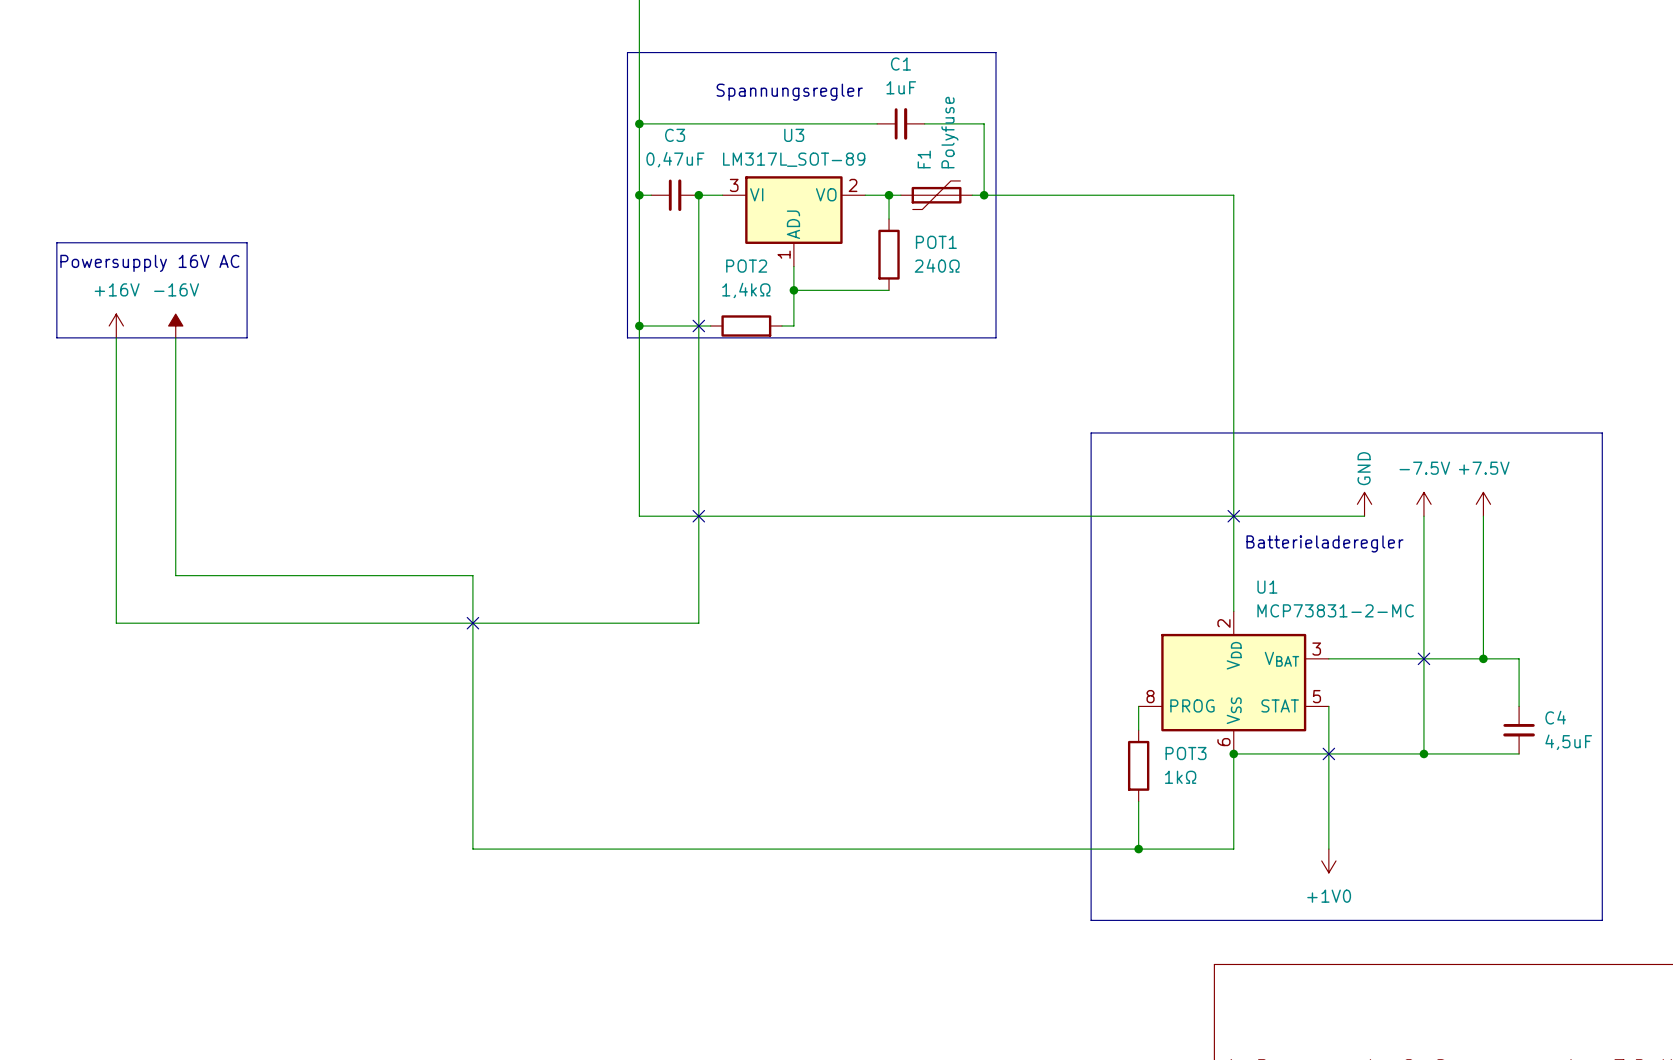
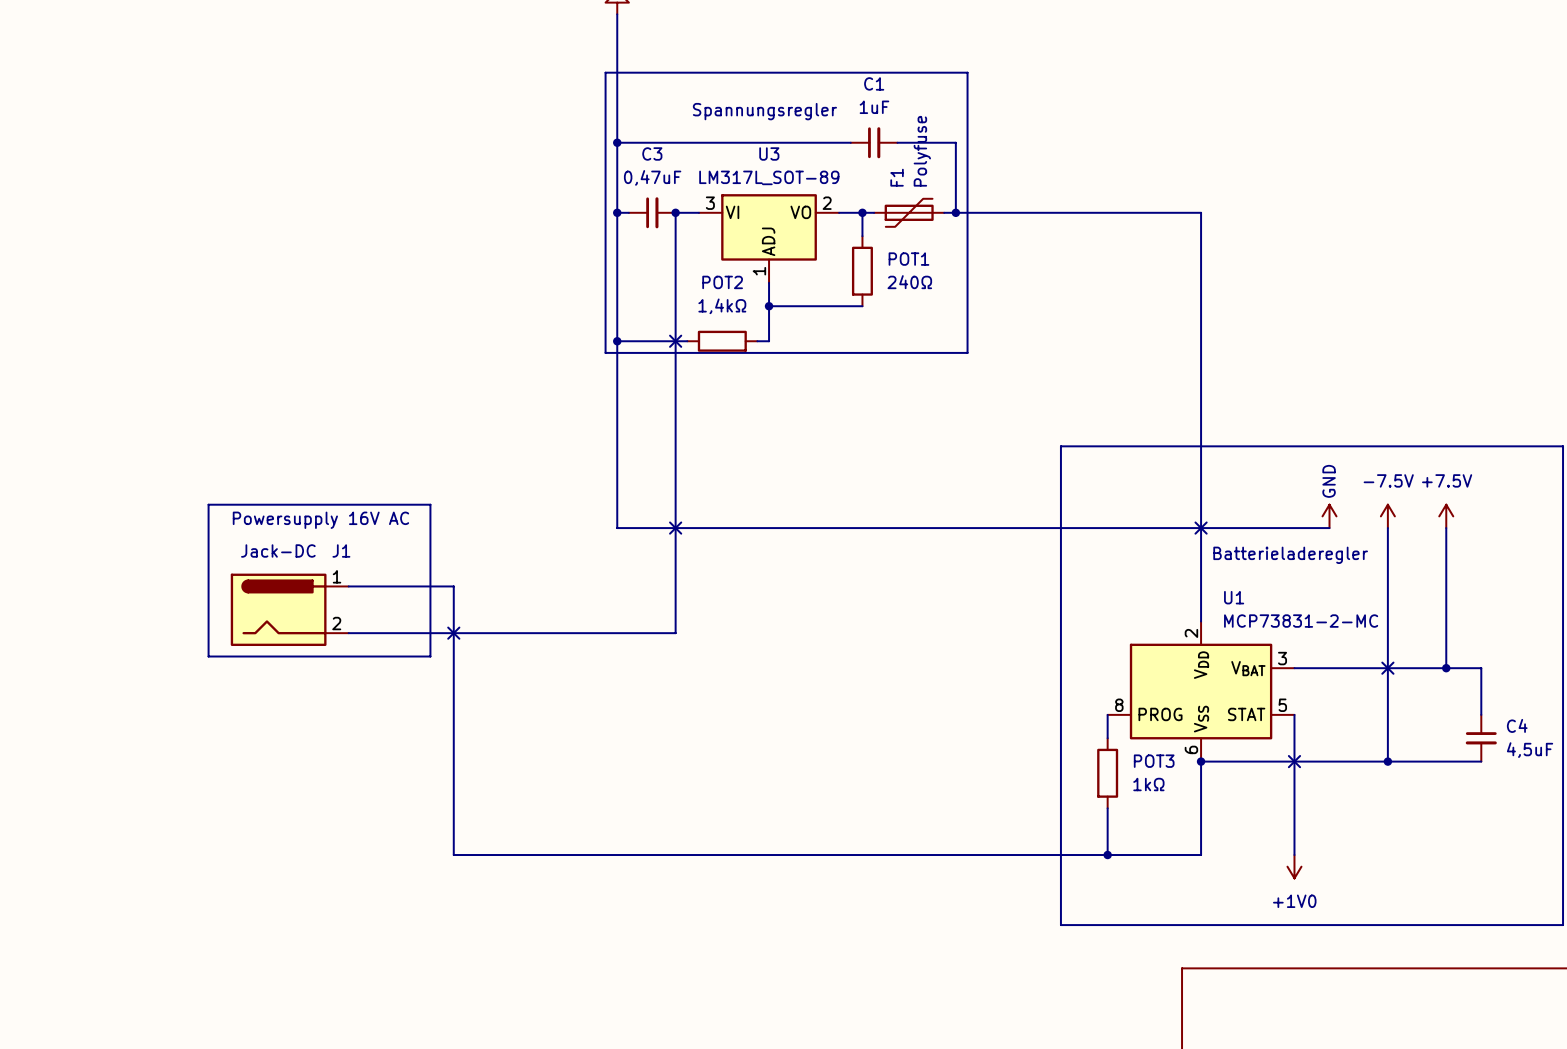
line: (56, 242) (247, 242) (247, 337) (56, 337) (56, 242) -> none
text: Powersupply 16V AC (149, 263) -> none
power symbol: +16V (116, 326) -> none
power symbol: -16V (175, 326) -> none
wire: (116, 337) (116, 623) (365, 623) -> none
wire: (175, 337) (175, 575) (365, 575) -> none
line: none -> (208, 504) (430, 504) (430, 656) (208, 656) (208, 504)
text: none -> Powersupply 16V AC (320, 520)
J1: none -> Jack-DC (289, 609)

